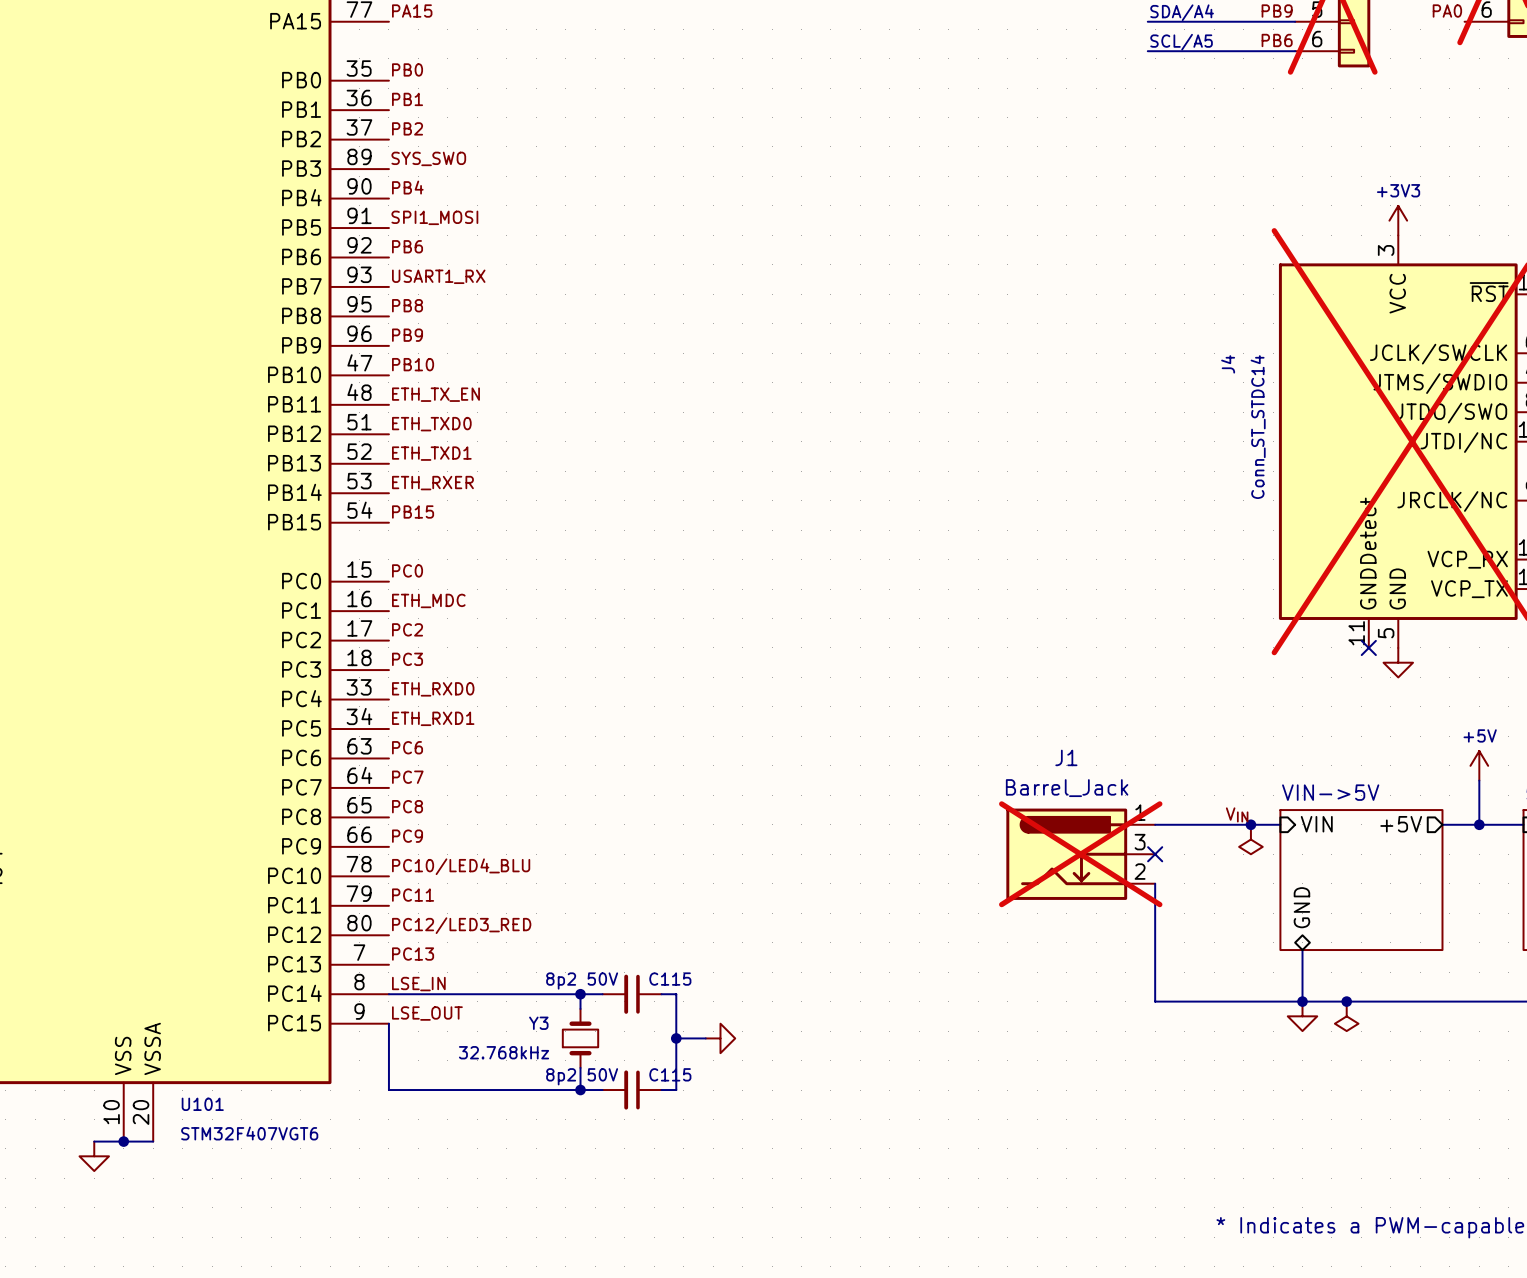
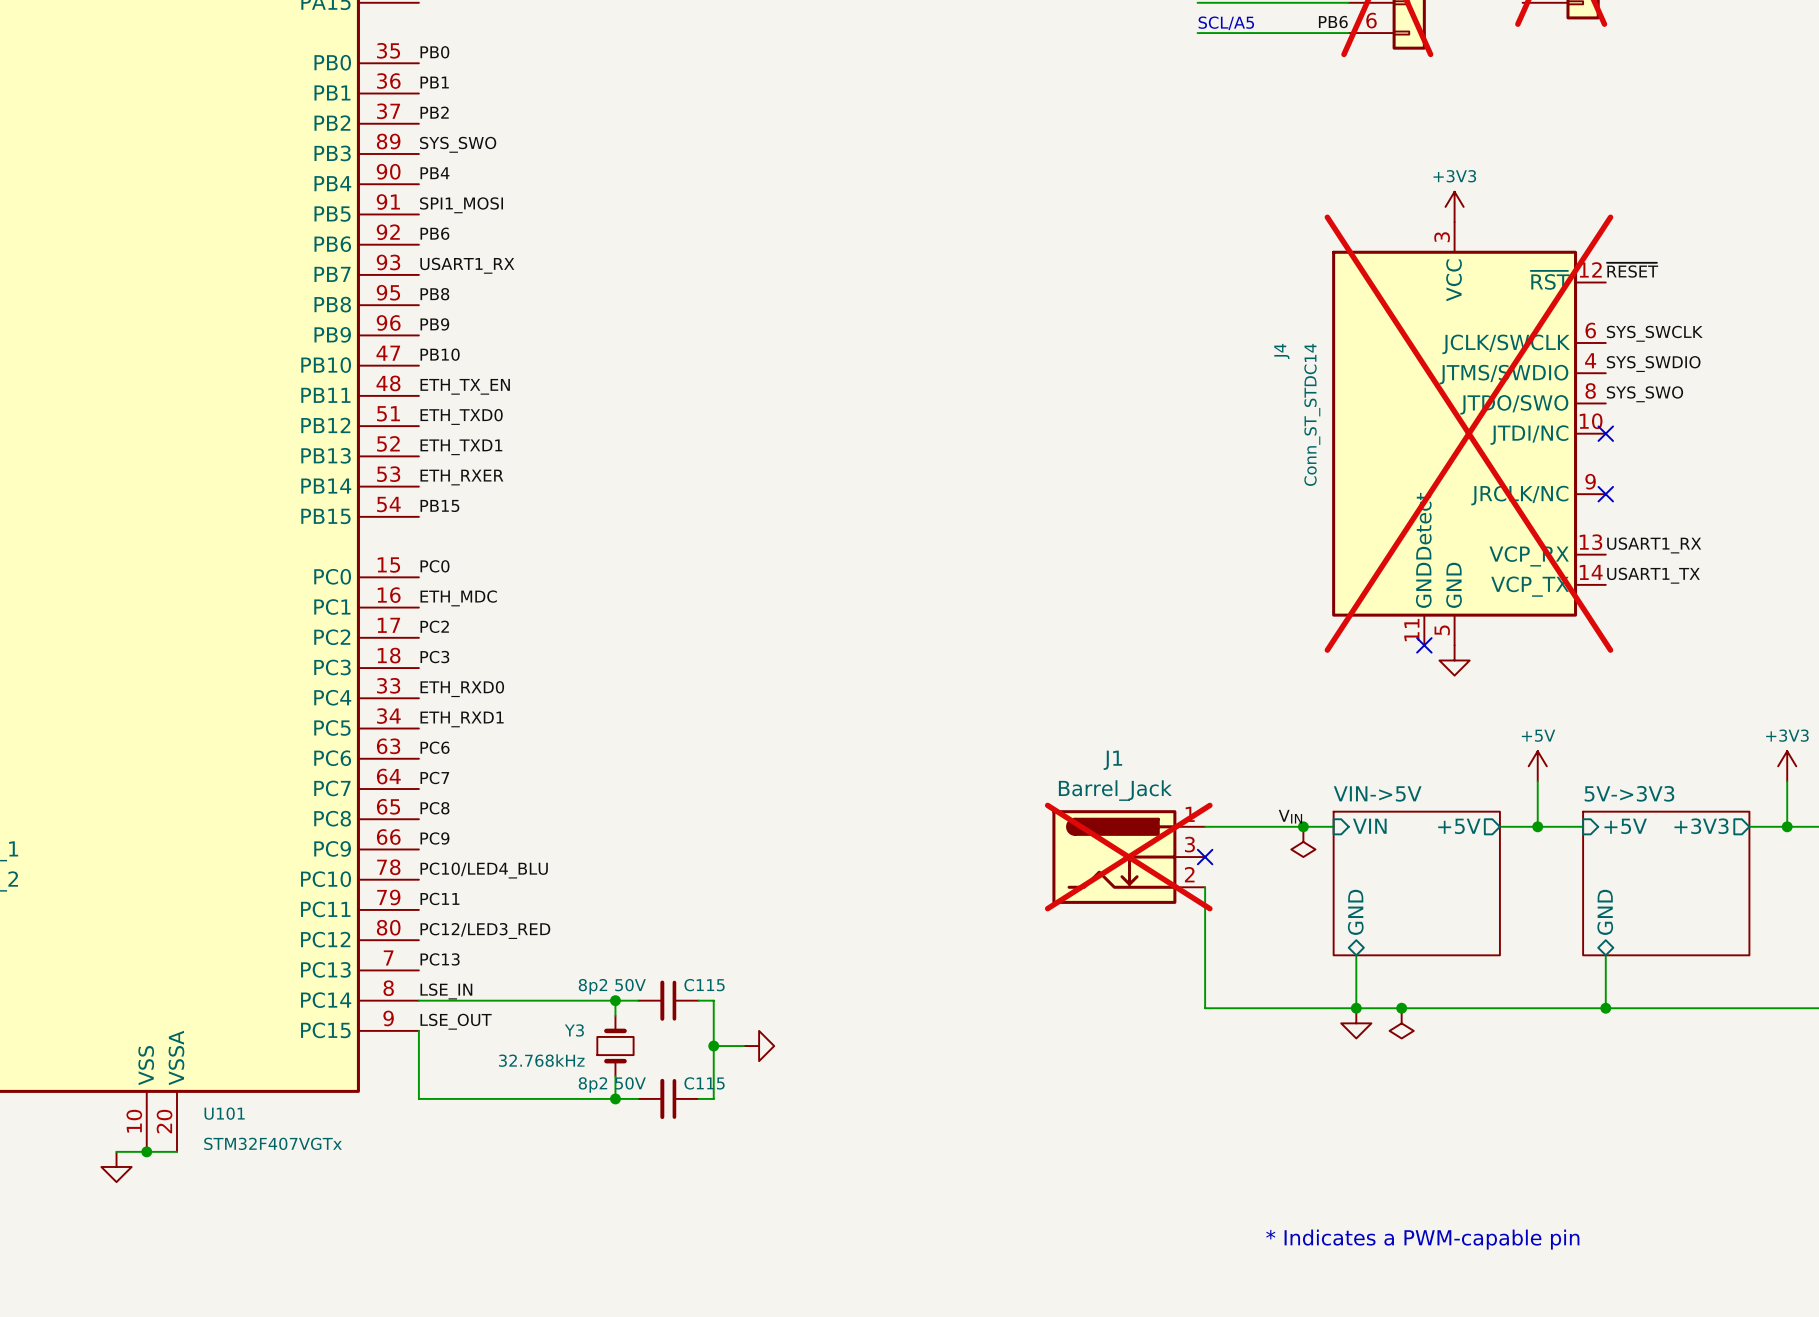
U101 value: STM32F407VGT6 (249, 1133) -> STM32F407VGTx (273, 1143)

